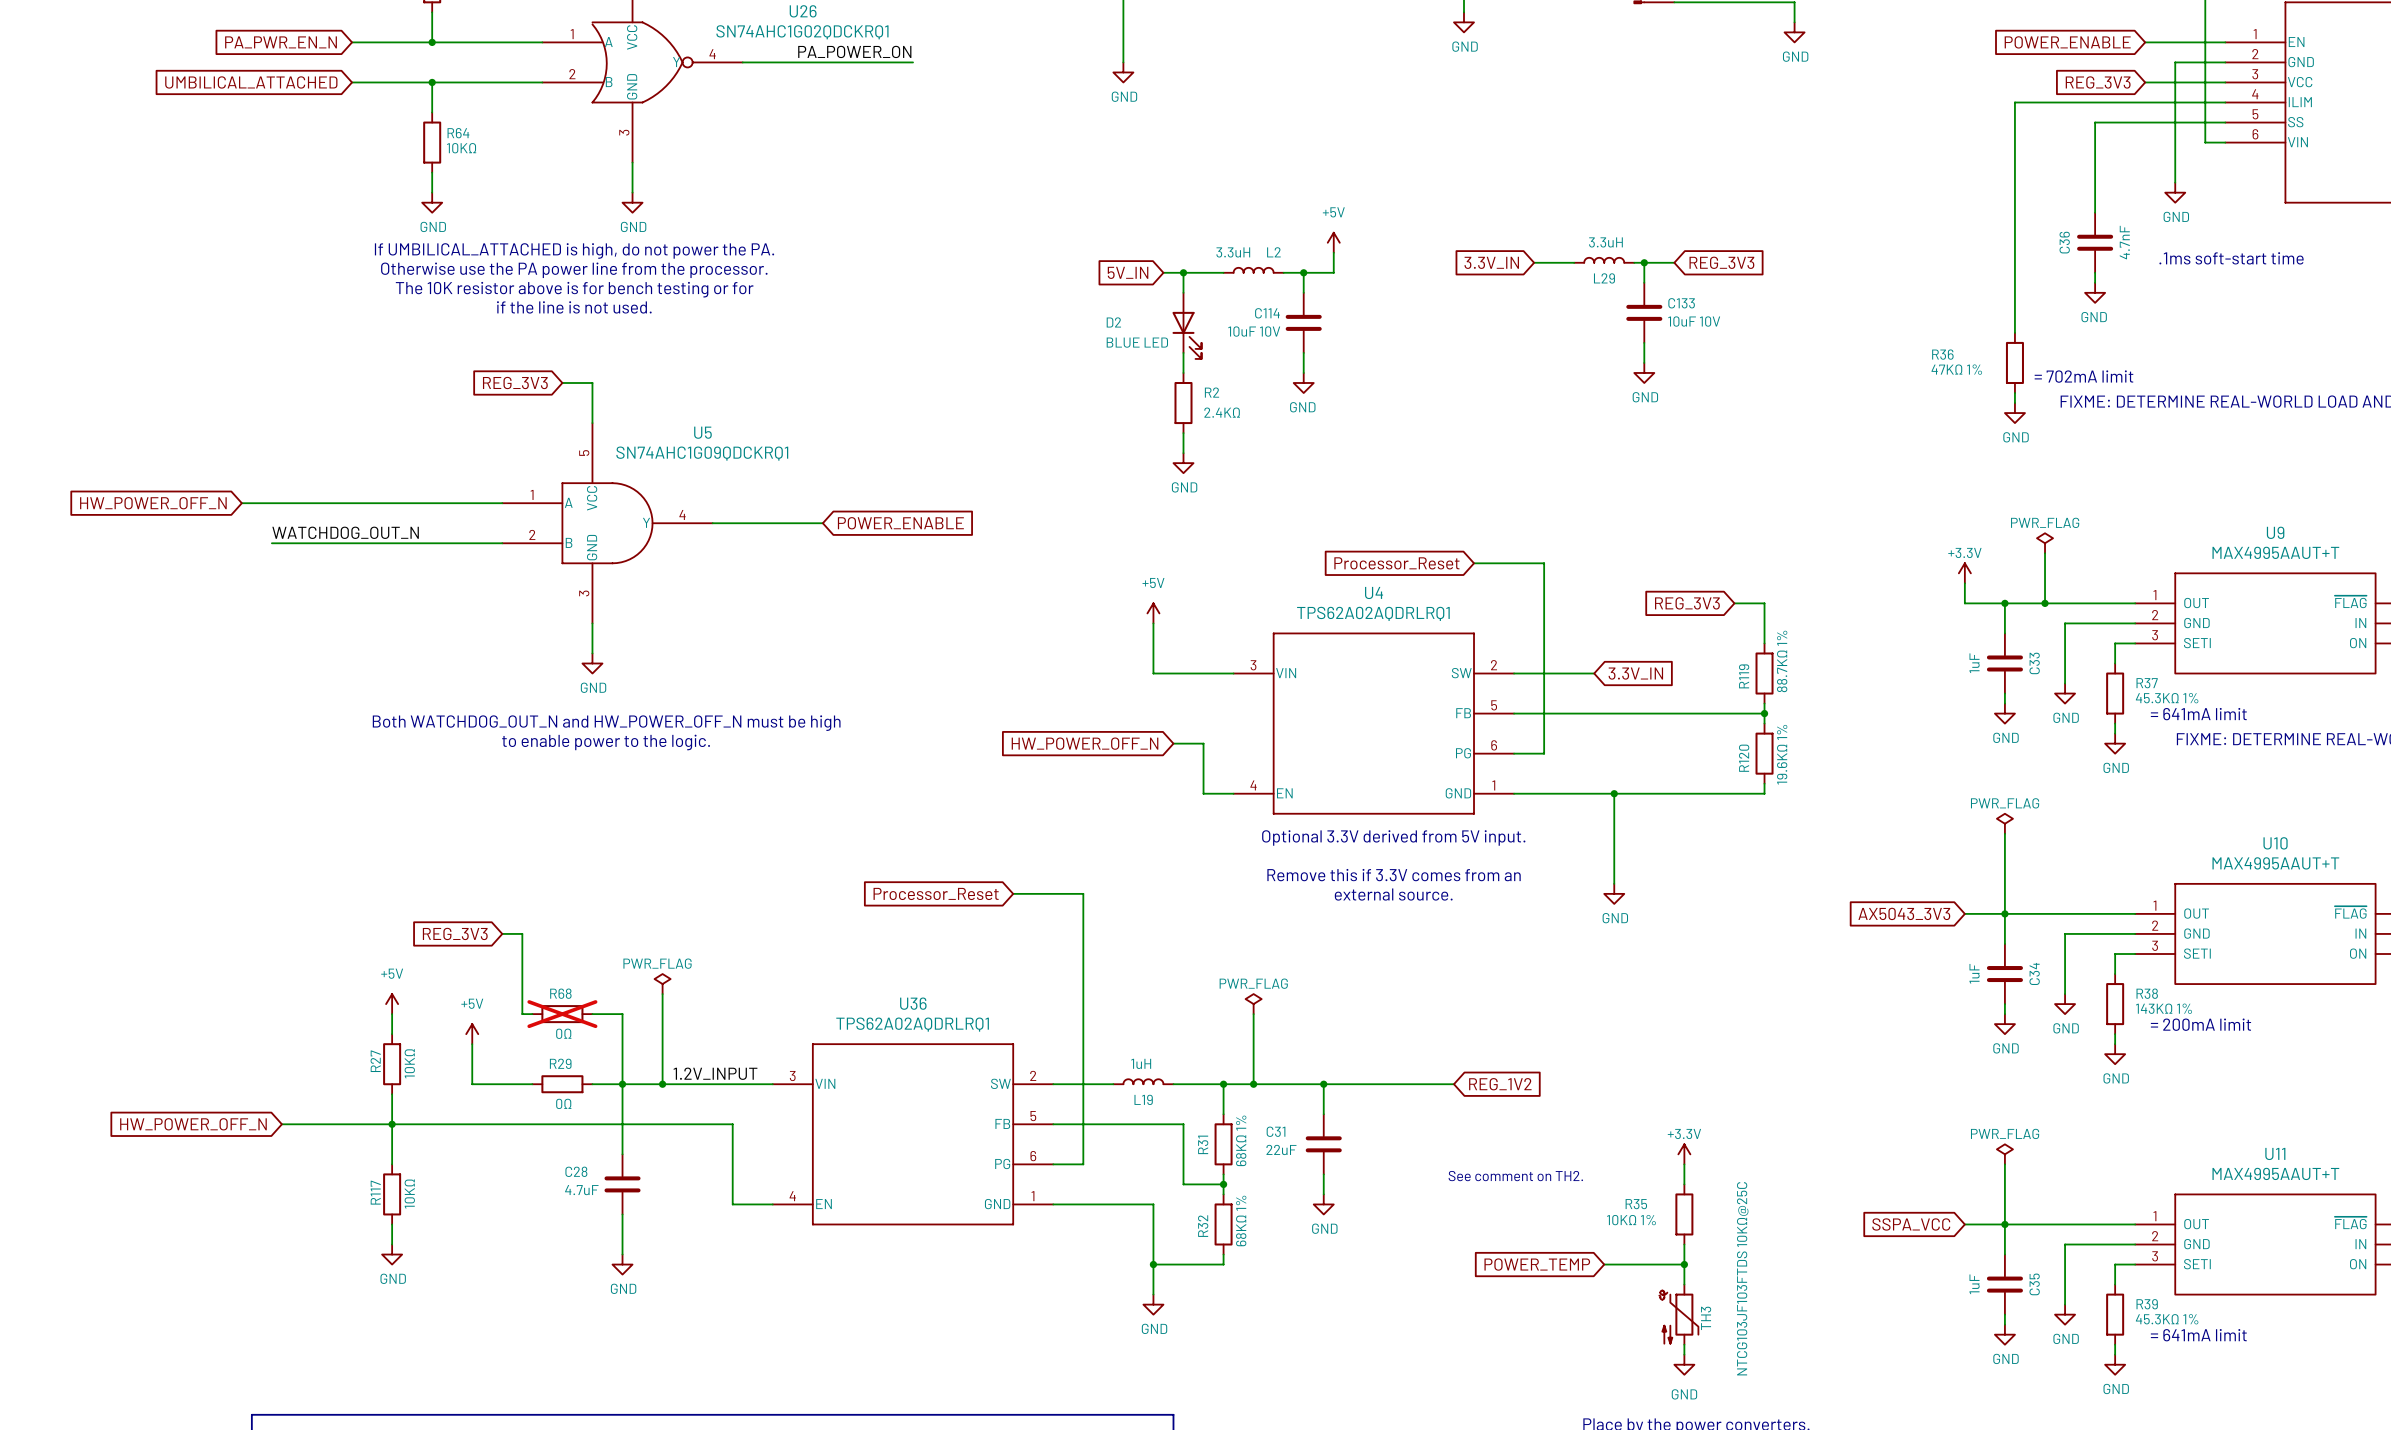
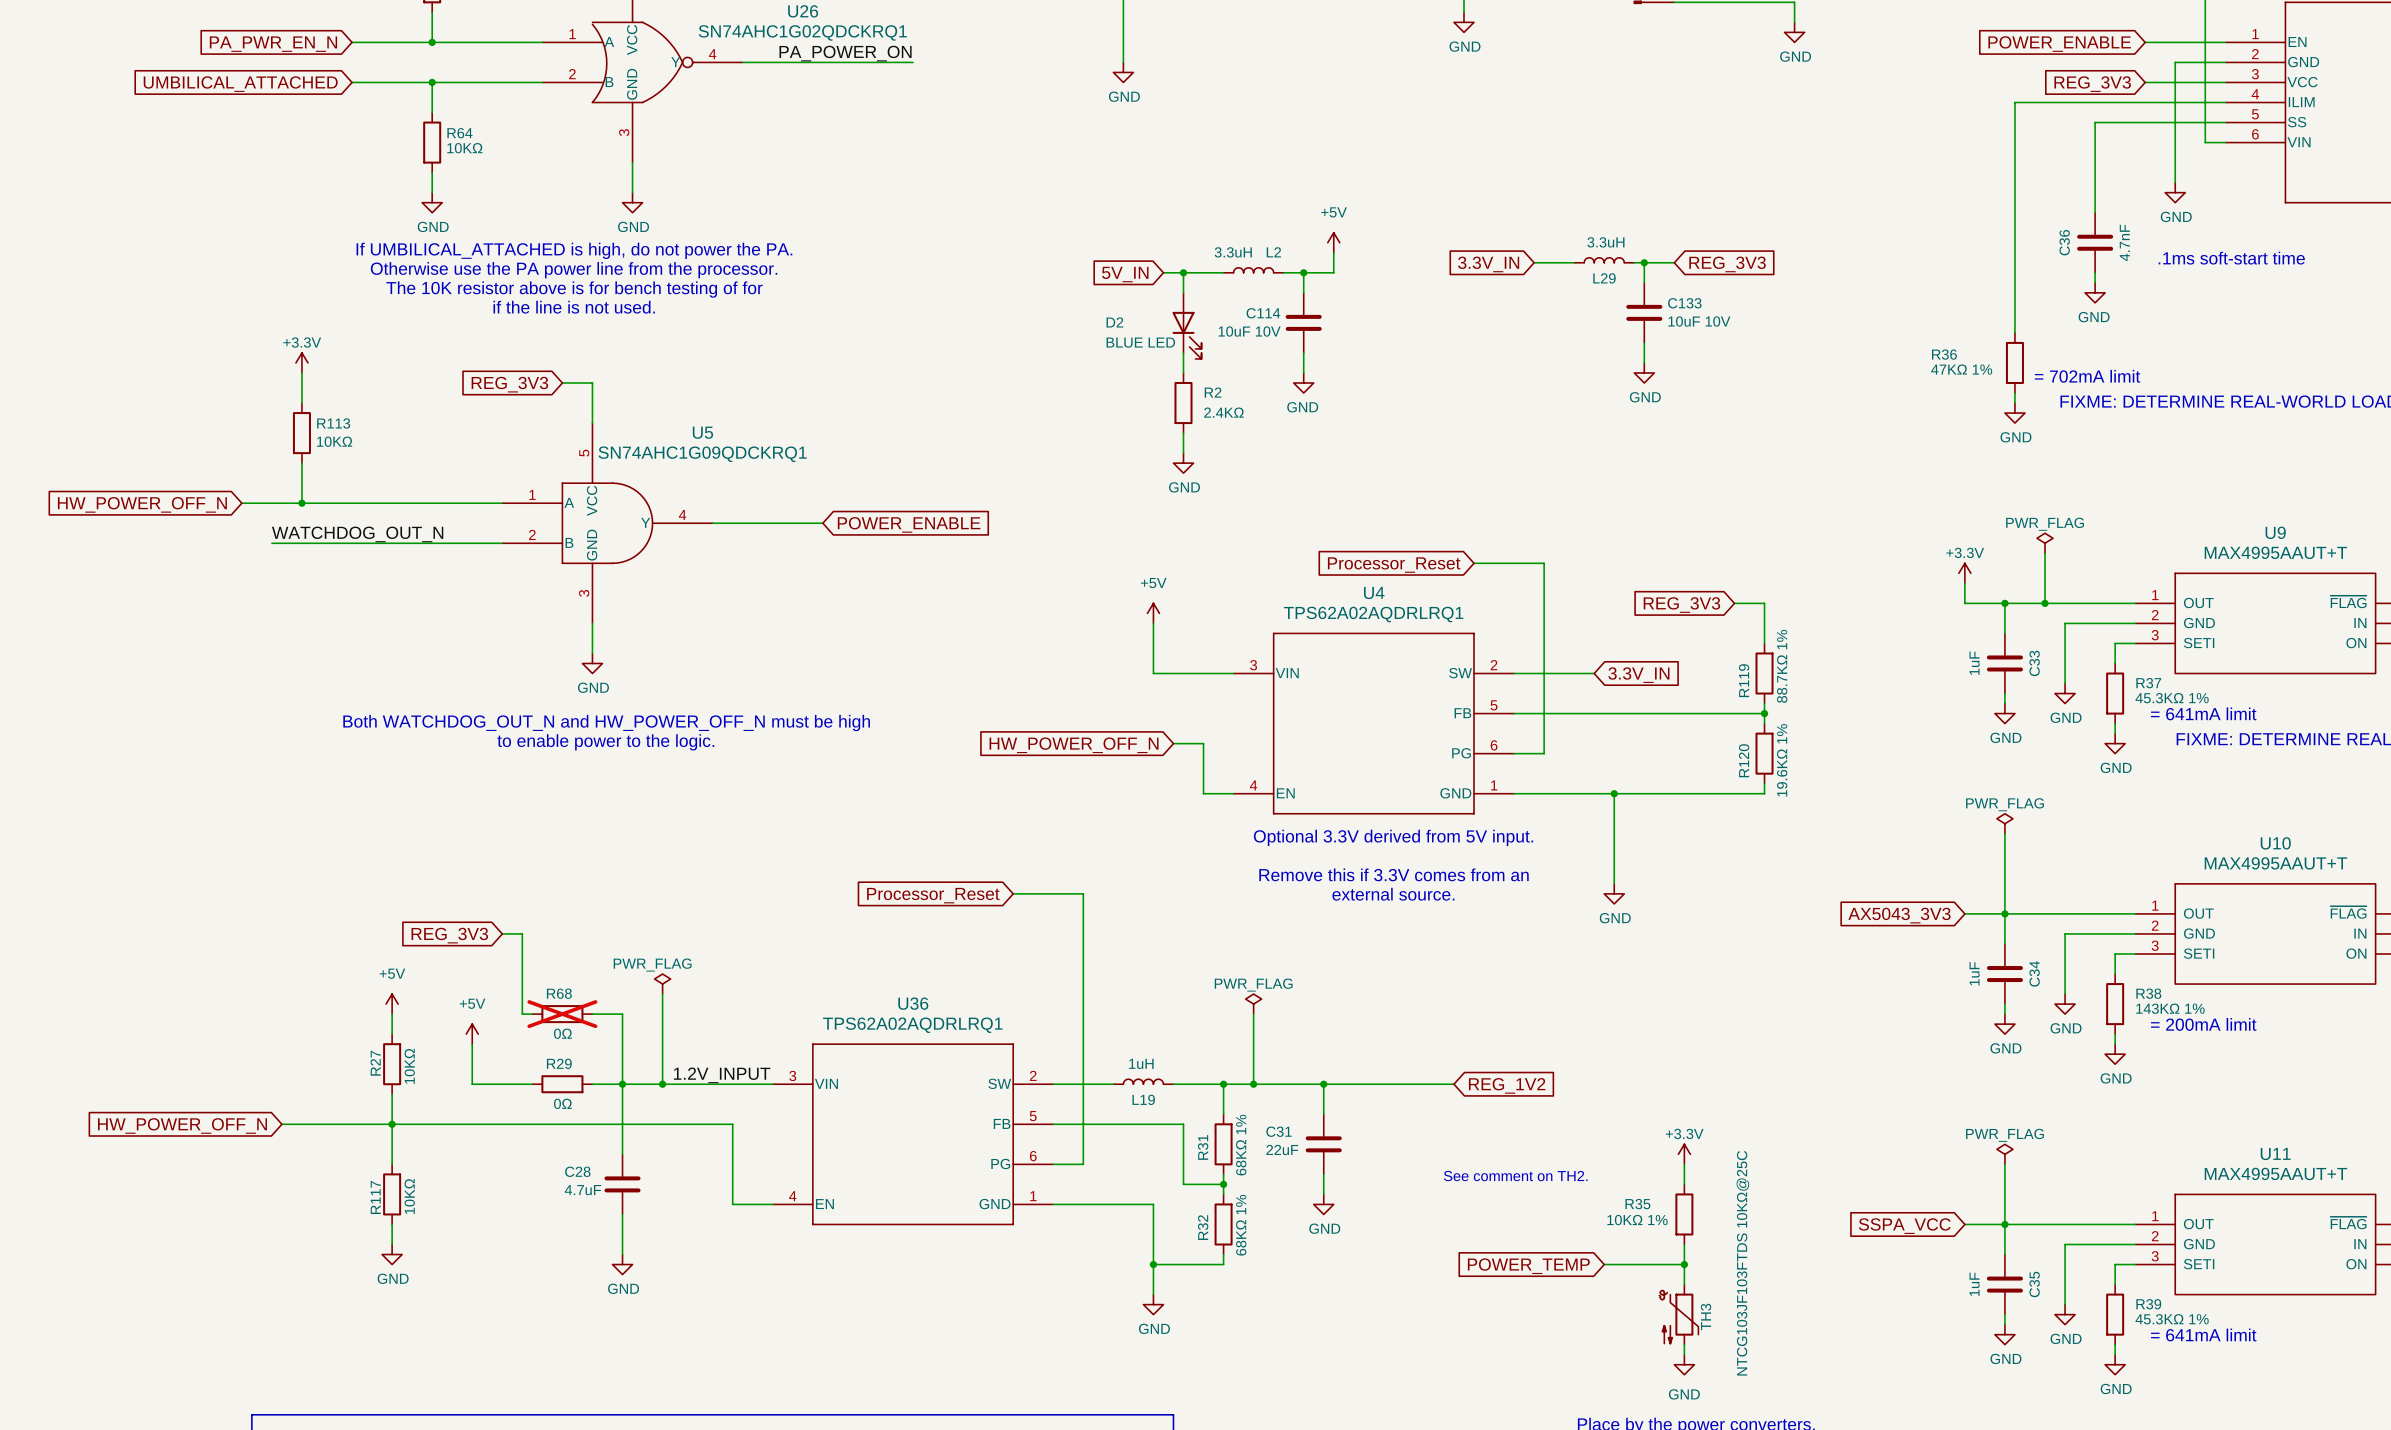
text: The 10K resistor above is for bench testing or for (574, 289) -> The 10K resistor above is for bench testing of for (574, 289)
power symbol: none -> +3.3V (301, 362)
wire: none -> (301, 372) (301, 403)
R113: none -> 10KΩ (301, 433)
wire: none -> (301, 463) (301, 503)
junction: none -> (301, 503)

